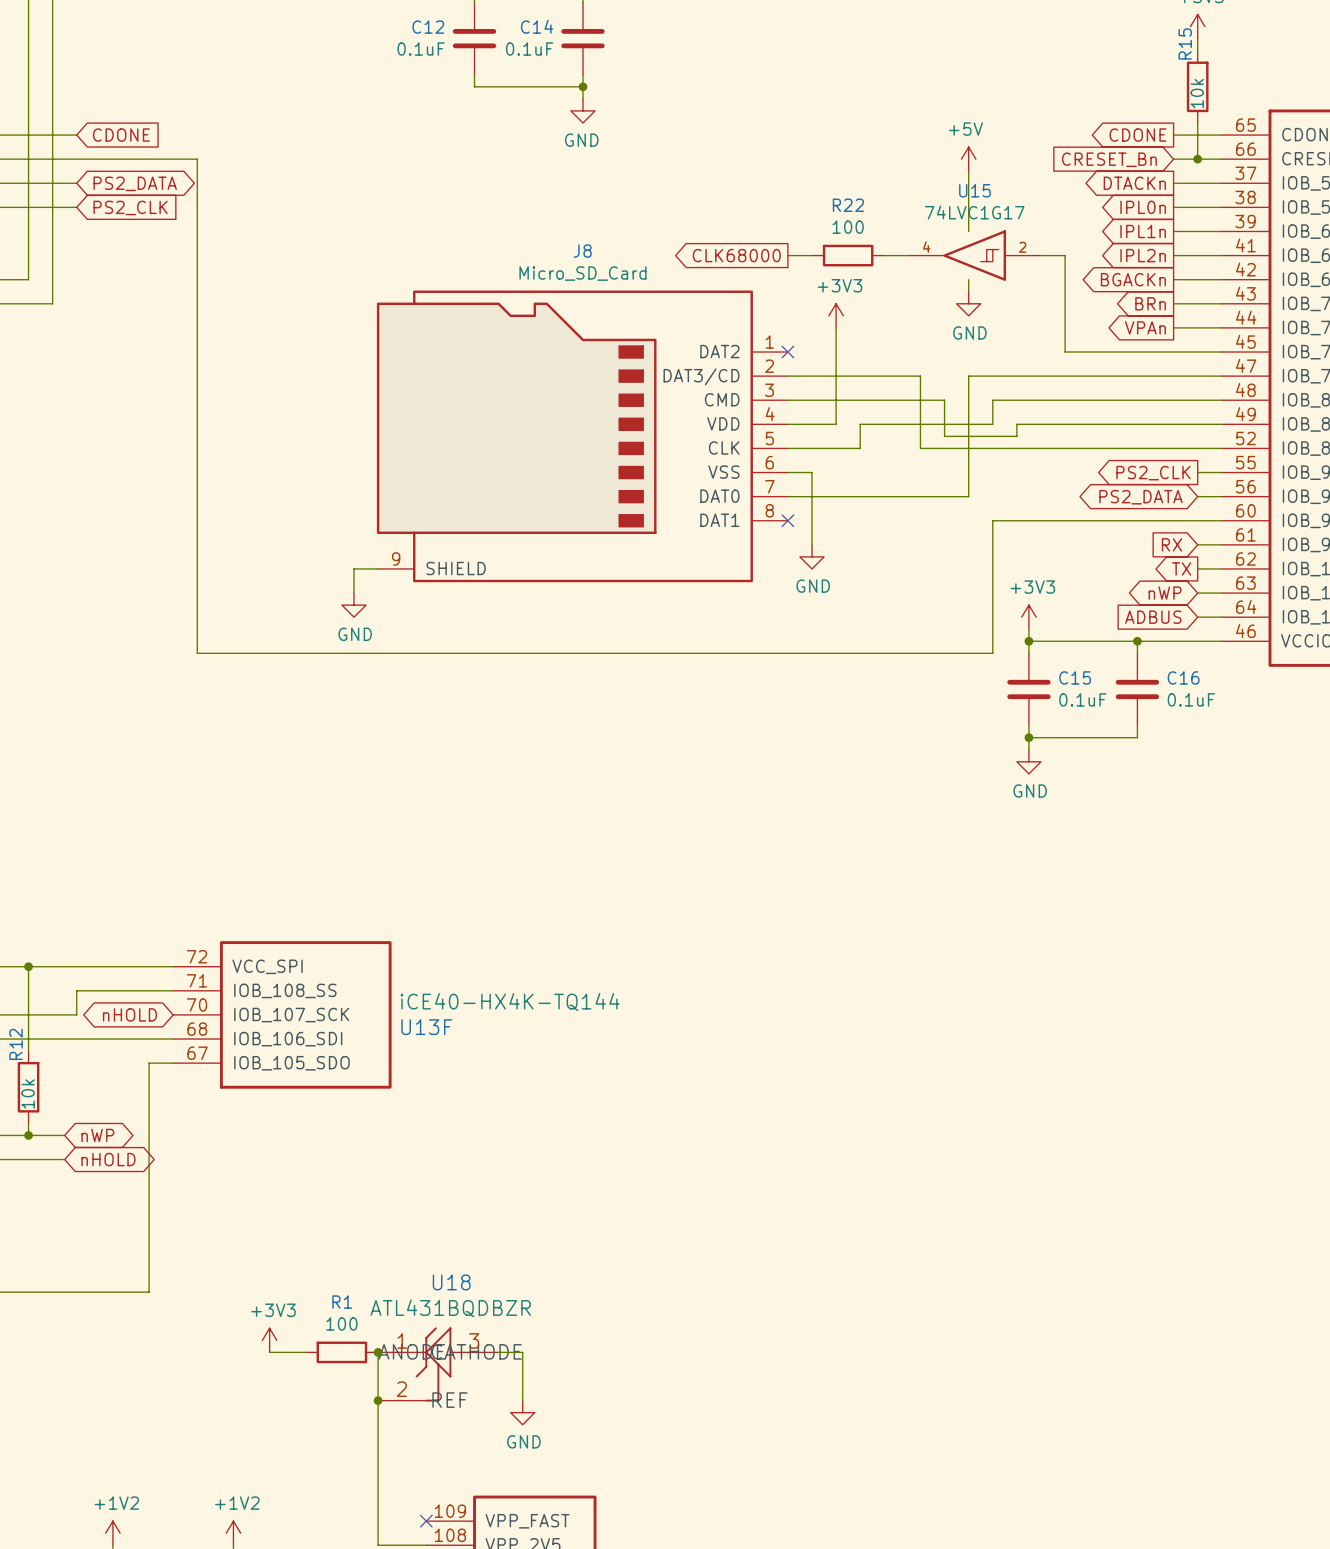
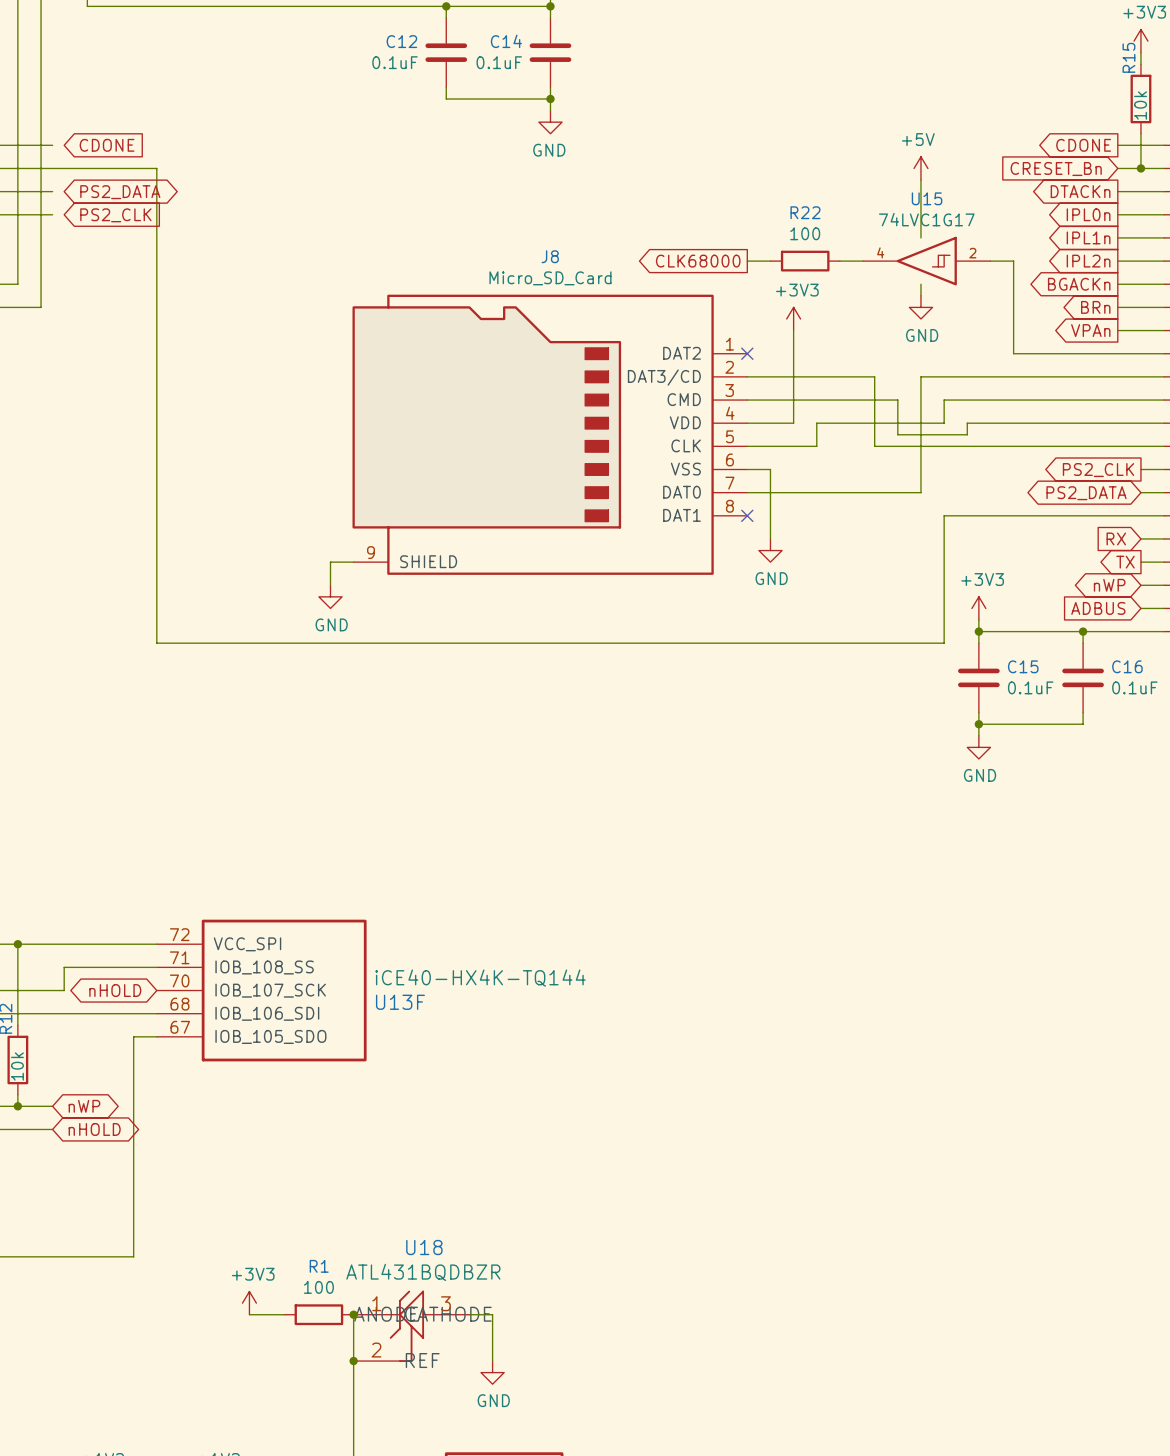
wire: (64, 135) (76, 135) -> none
wire: (173, 159) (197, 159) (197, 653) -> (156, 168) (156, 643) (179, 643)
wire: (64, 183) (76, 183) -> none
wire: (64, 207) (76, 207) -> none

